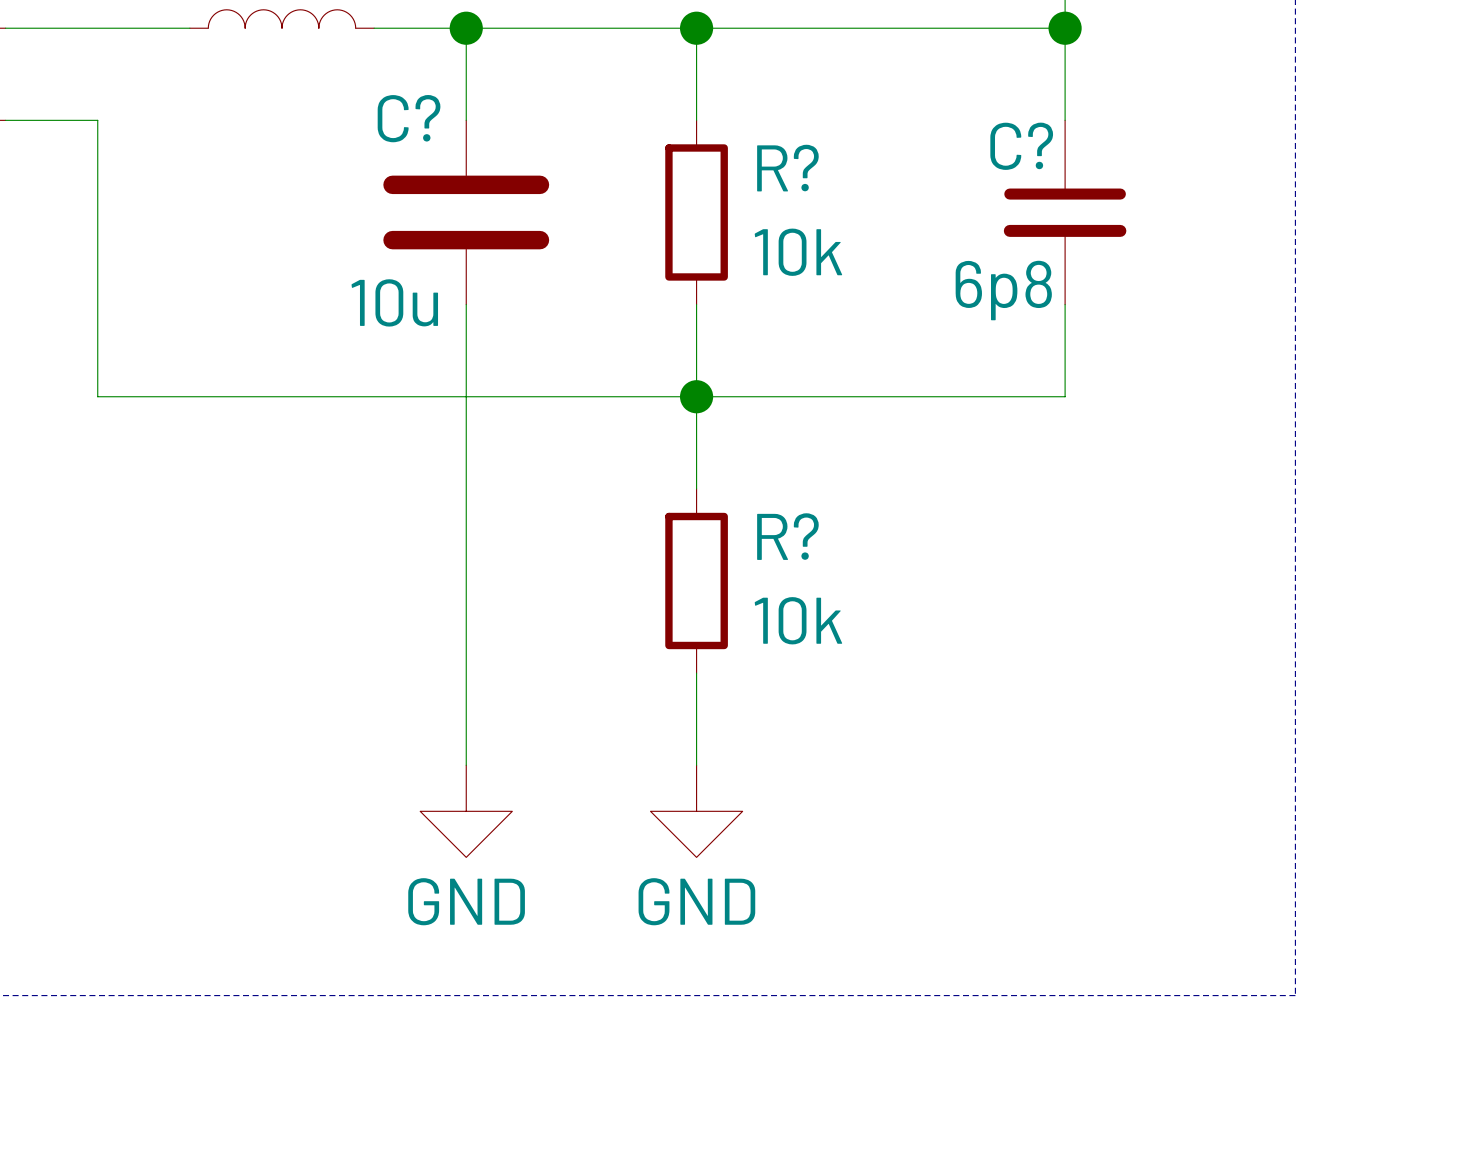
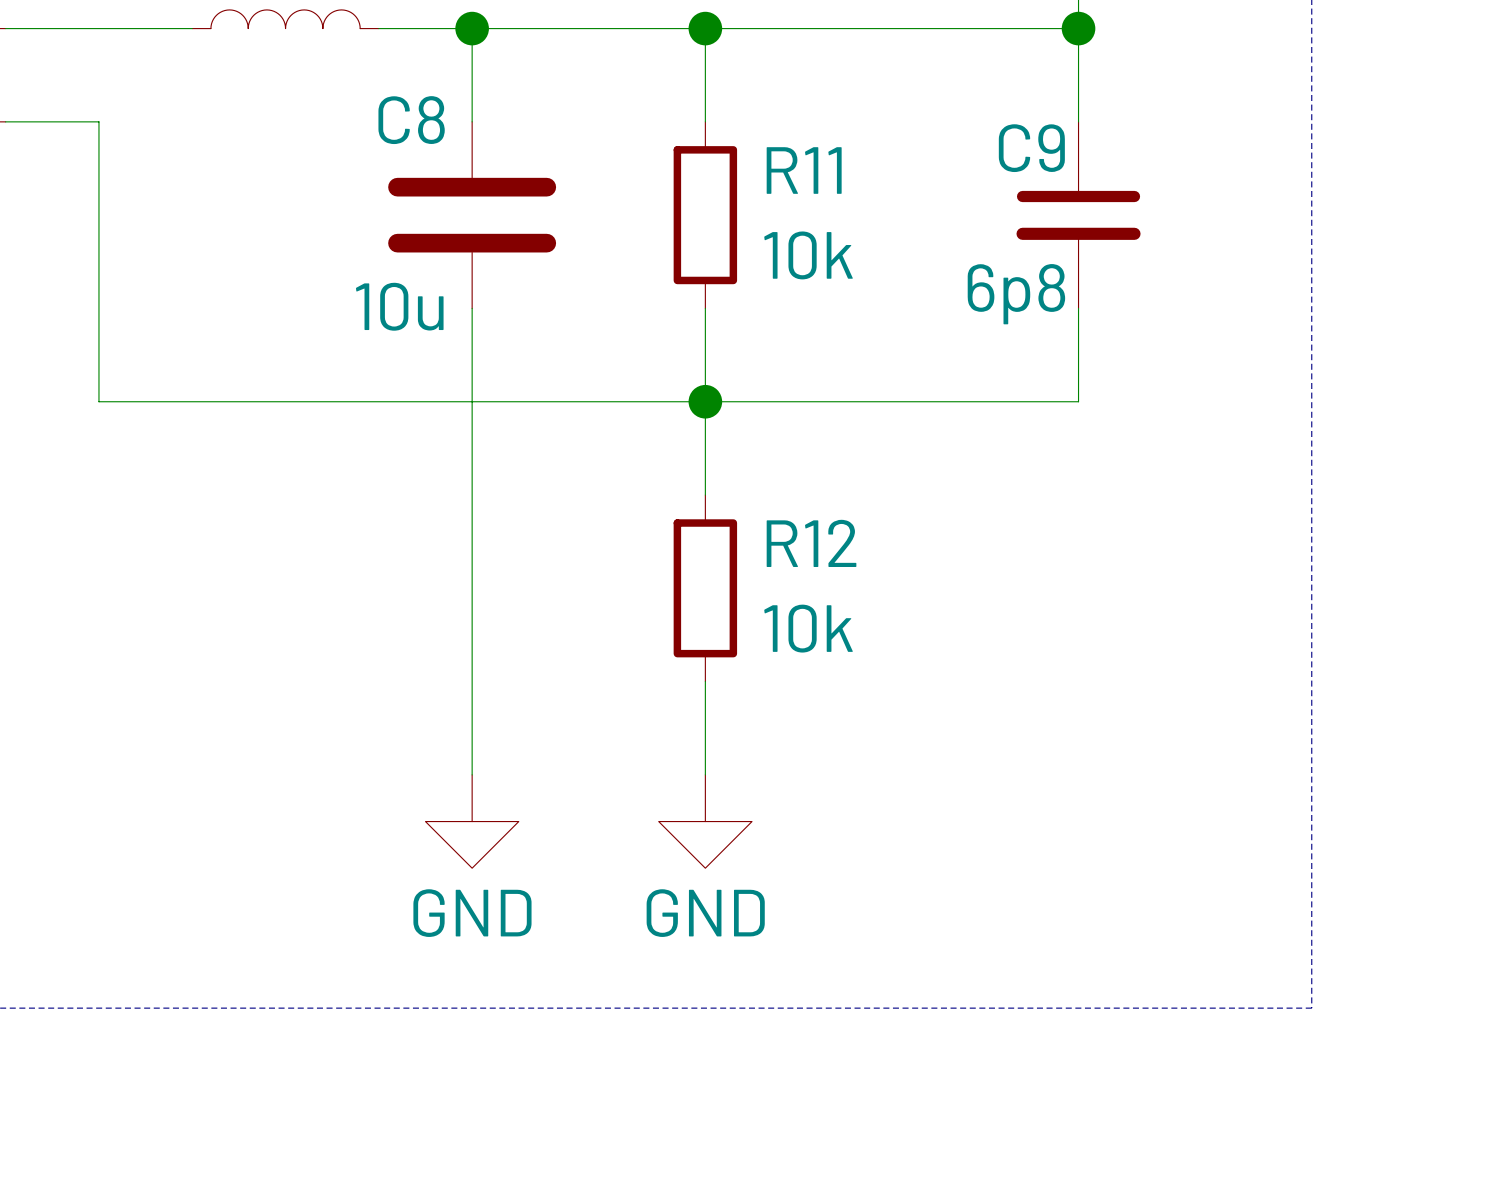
C? name: C? (409, 118) -> C8 (411, 120)
C? name: C? (1021, 146) -> C9 (1031, 148)
R? name: R? (787, 168) -> R11 (804, 170)
R? name: R? (787, 536) -> R12 (811, 543)

